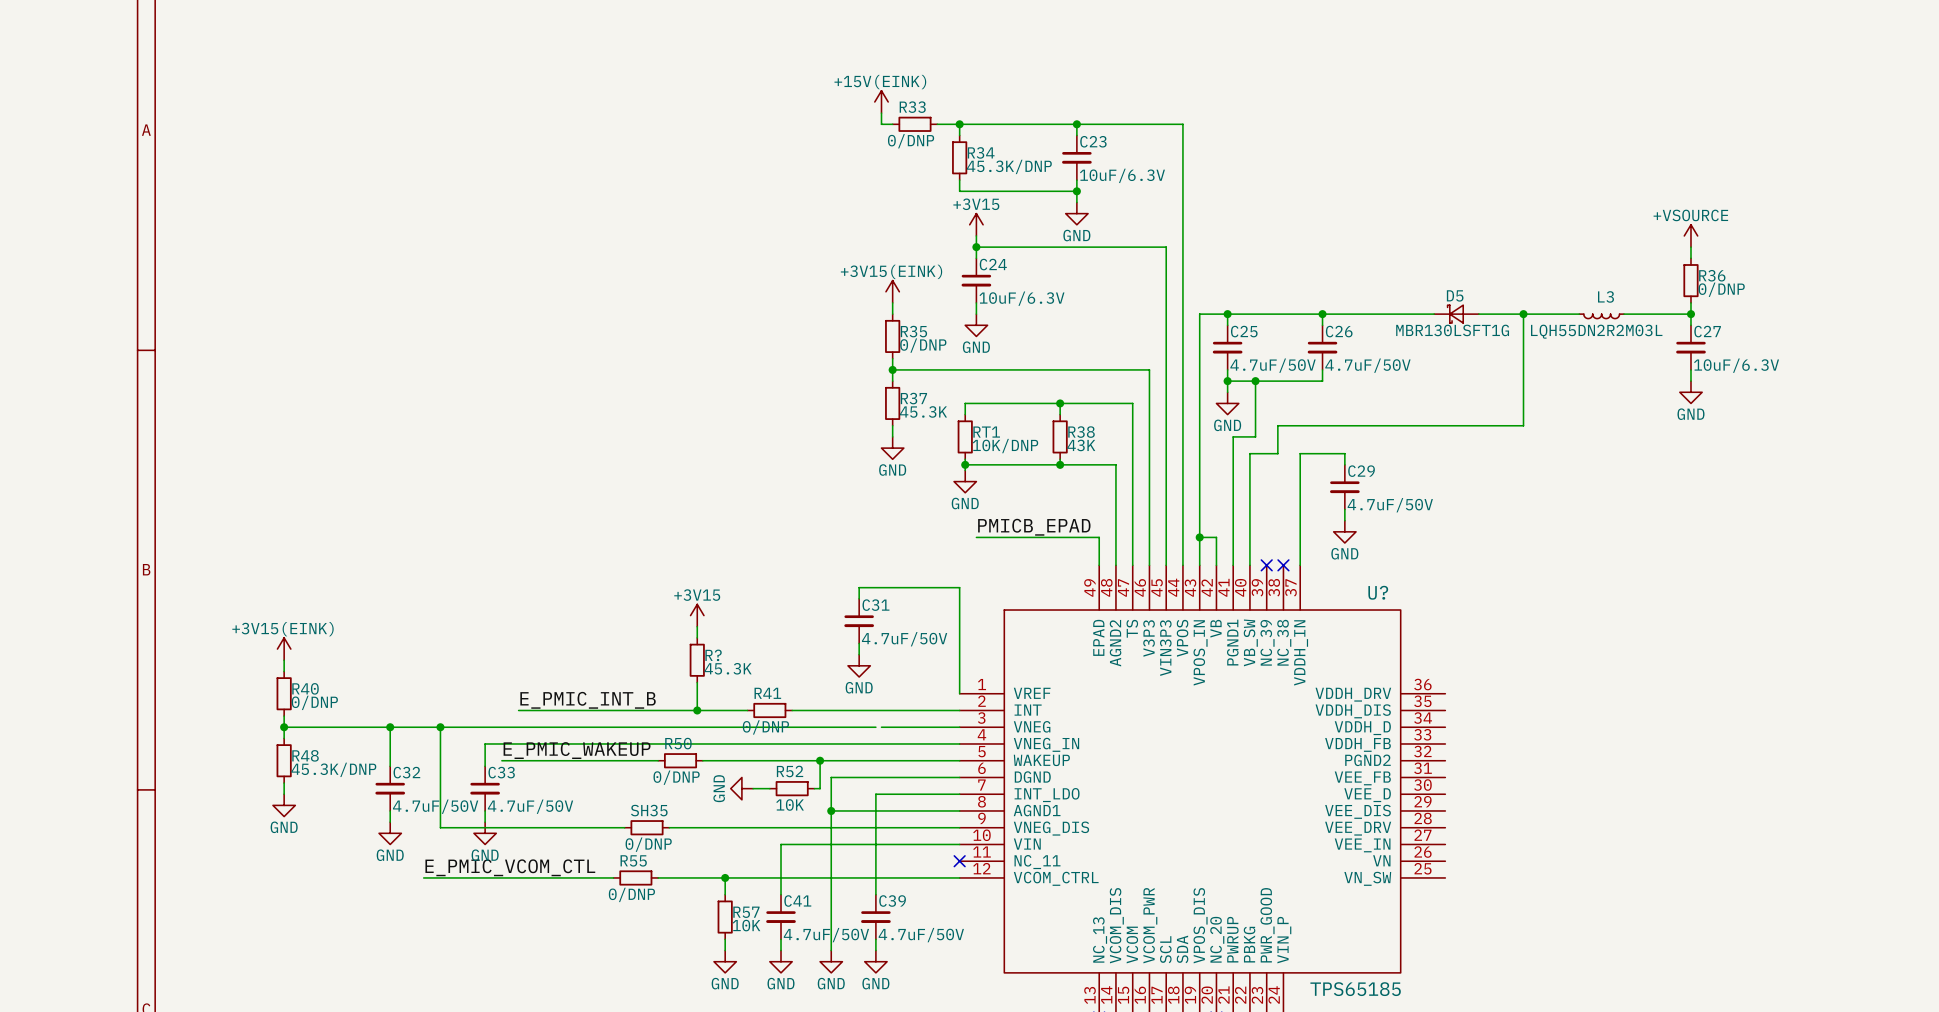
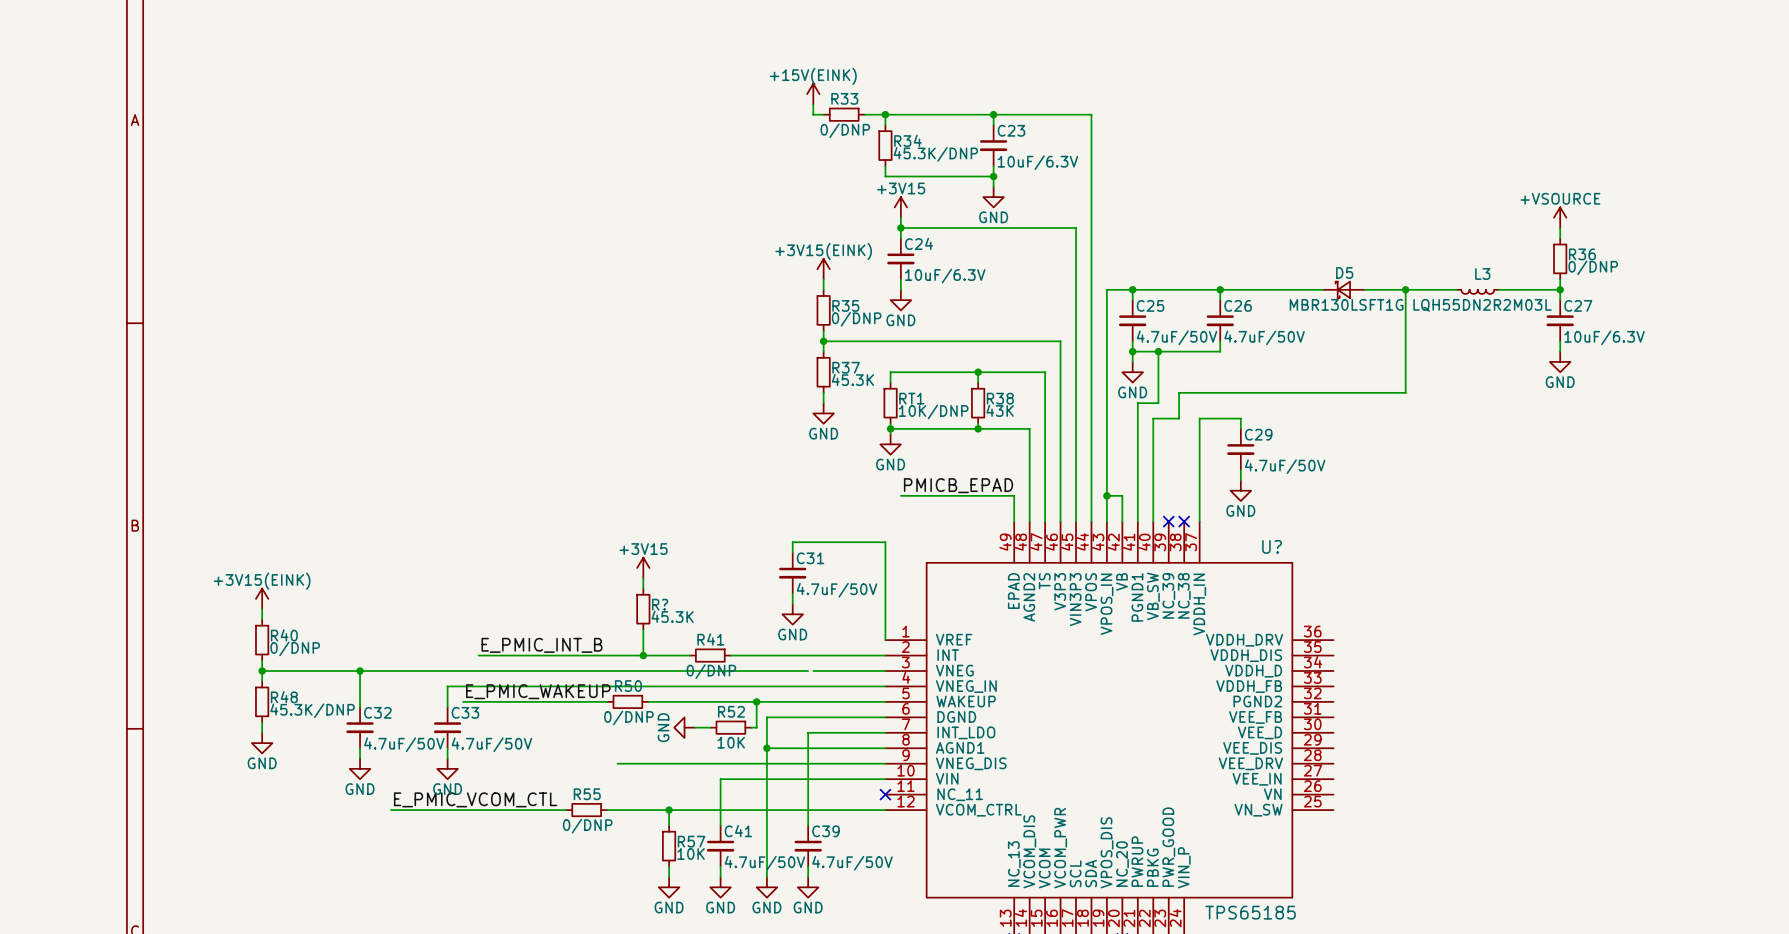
wire: (440, 727) (440, 827) (624, 827) -> none
junction: (440, 727) -> none
SH35: 0/DNP (647, 827) -> none

